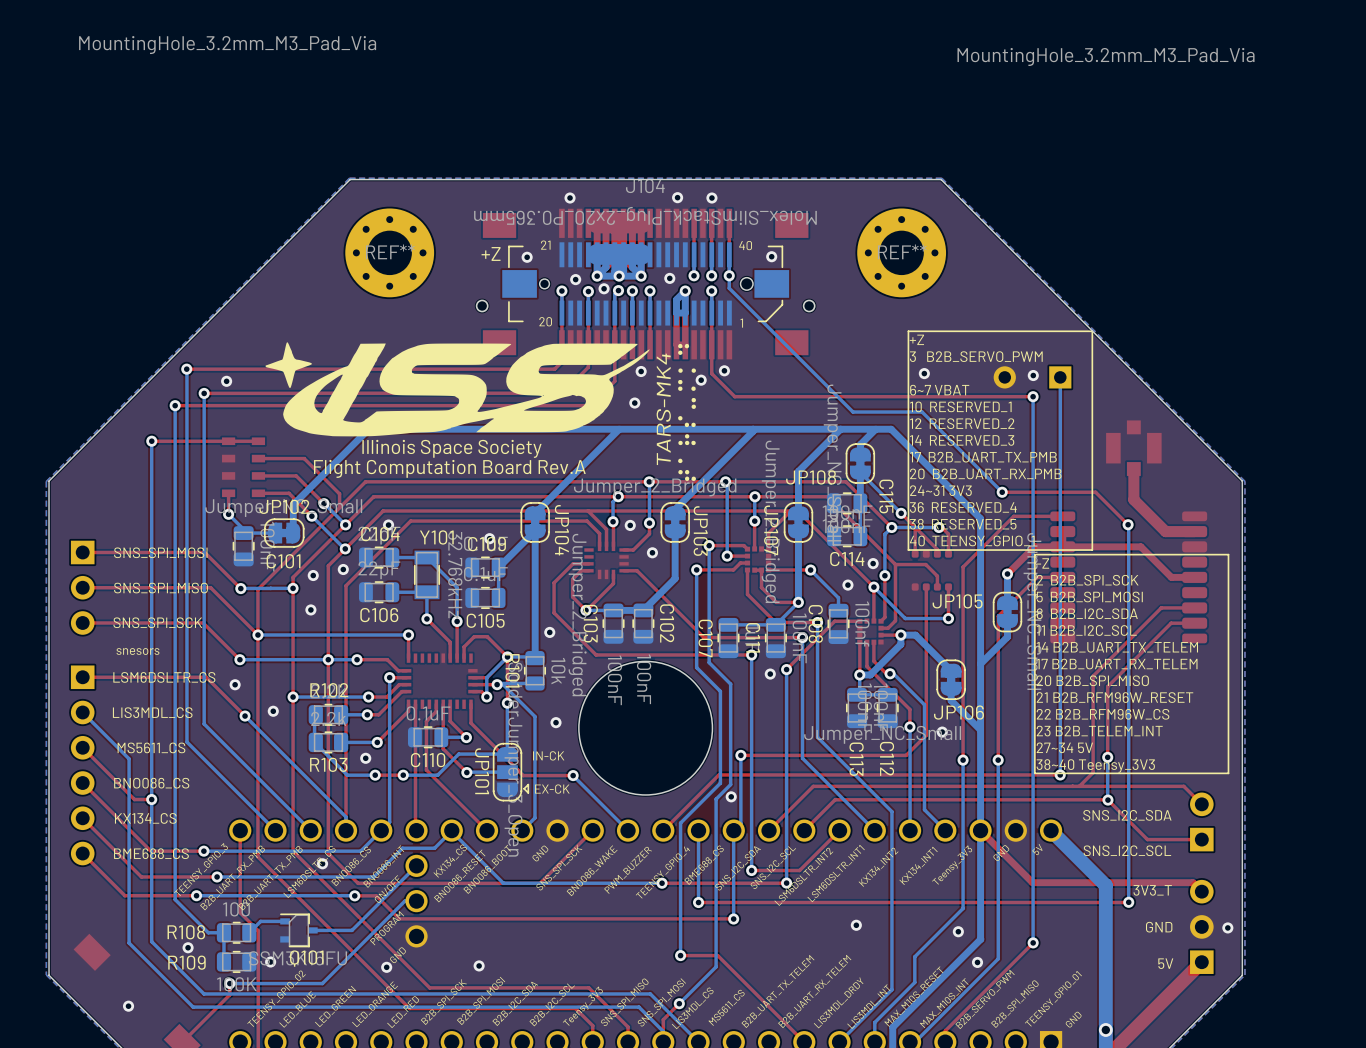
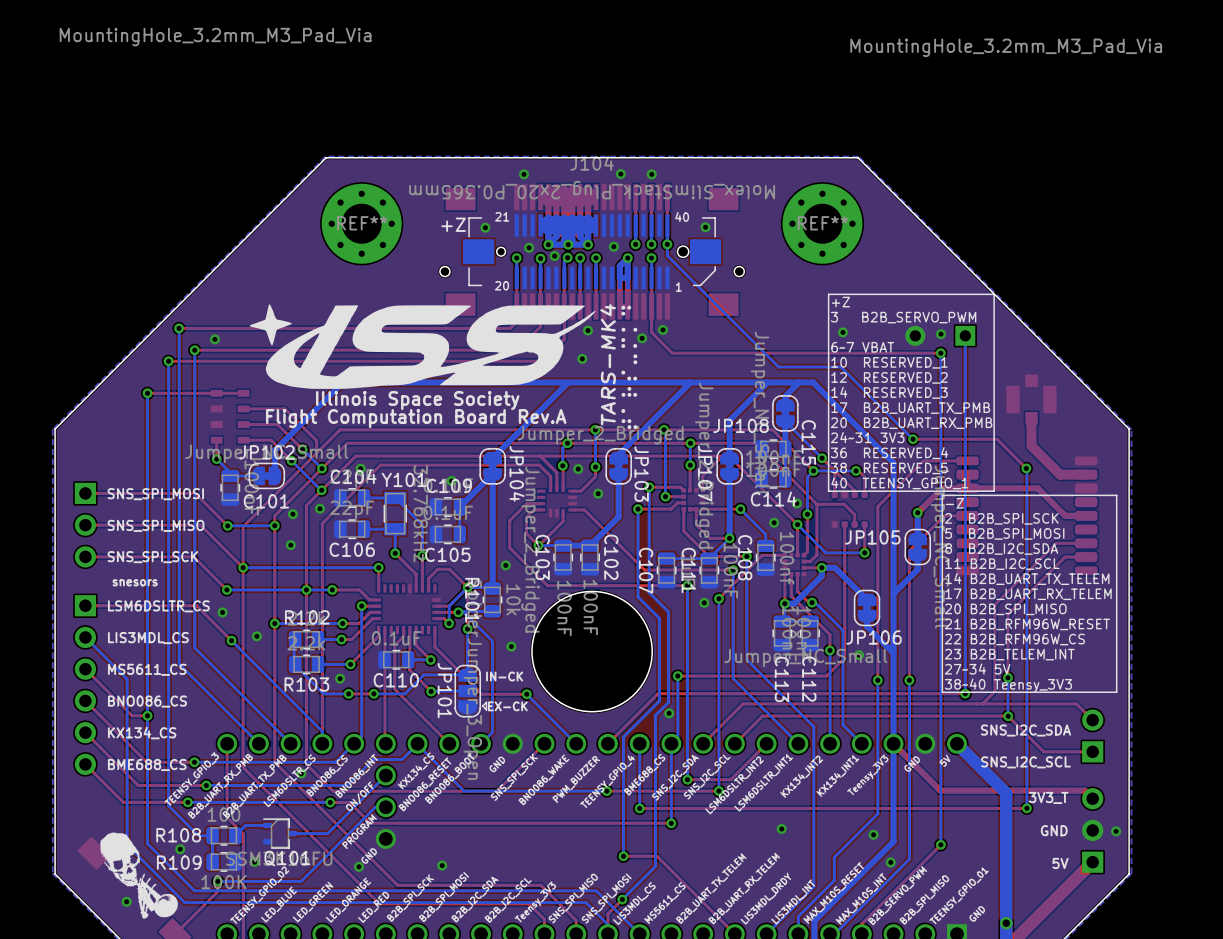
drawing: none -> [100, 832, 178, 919]

